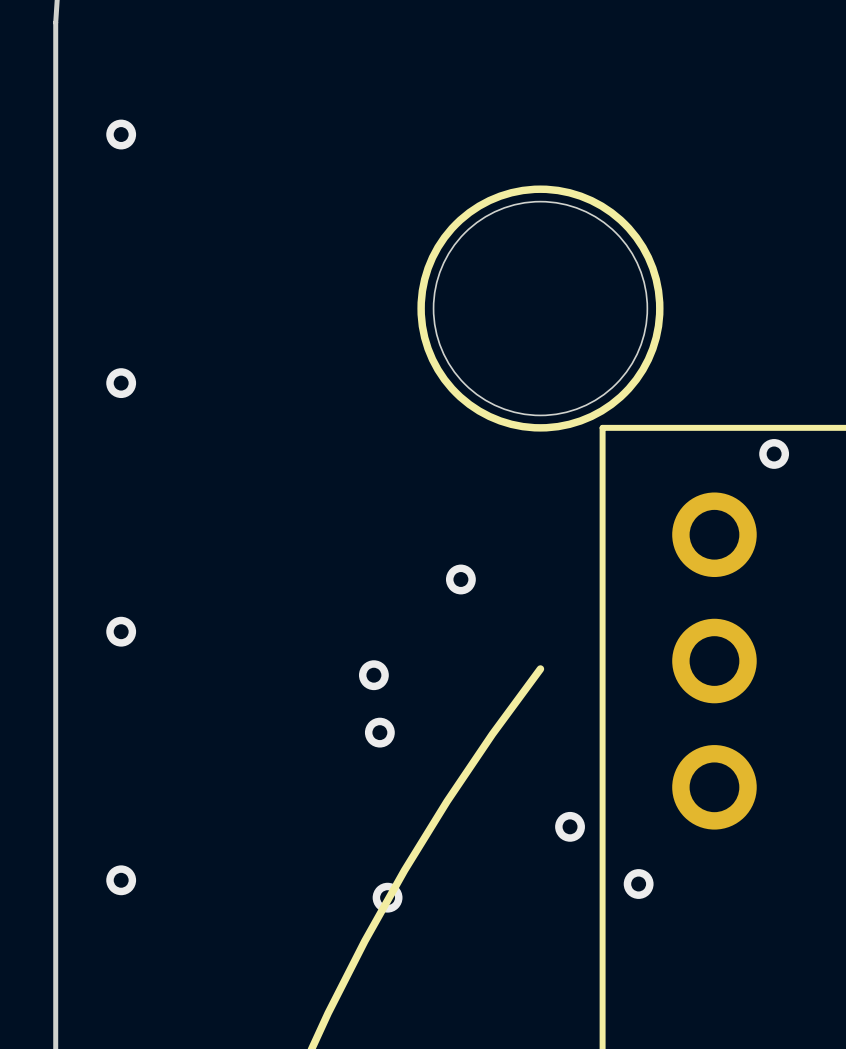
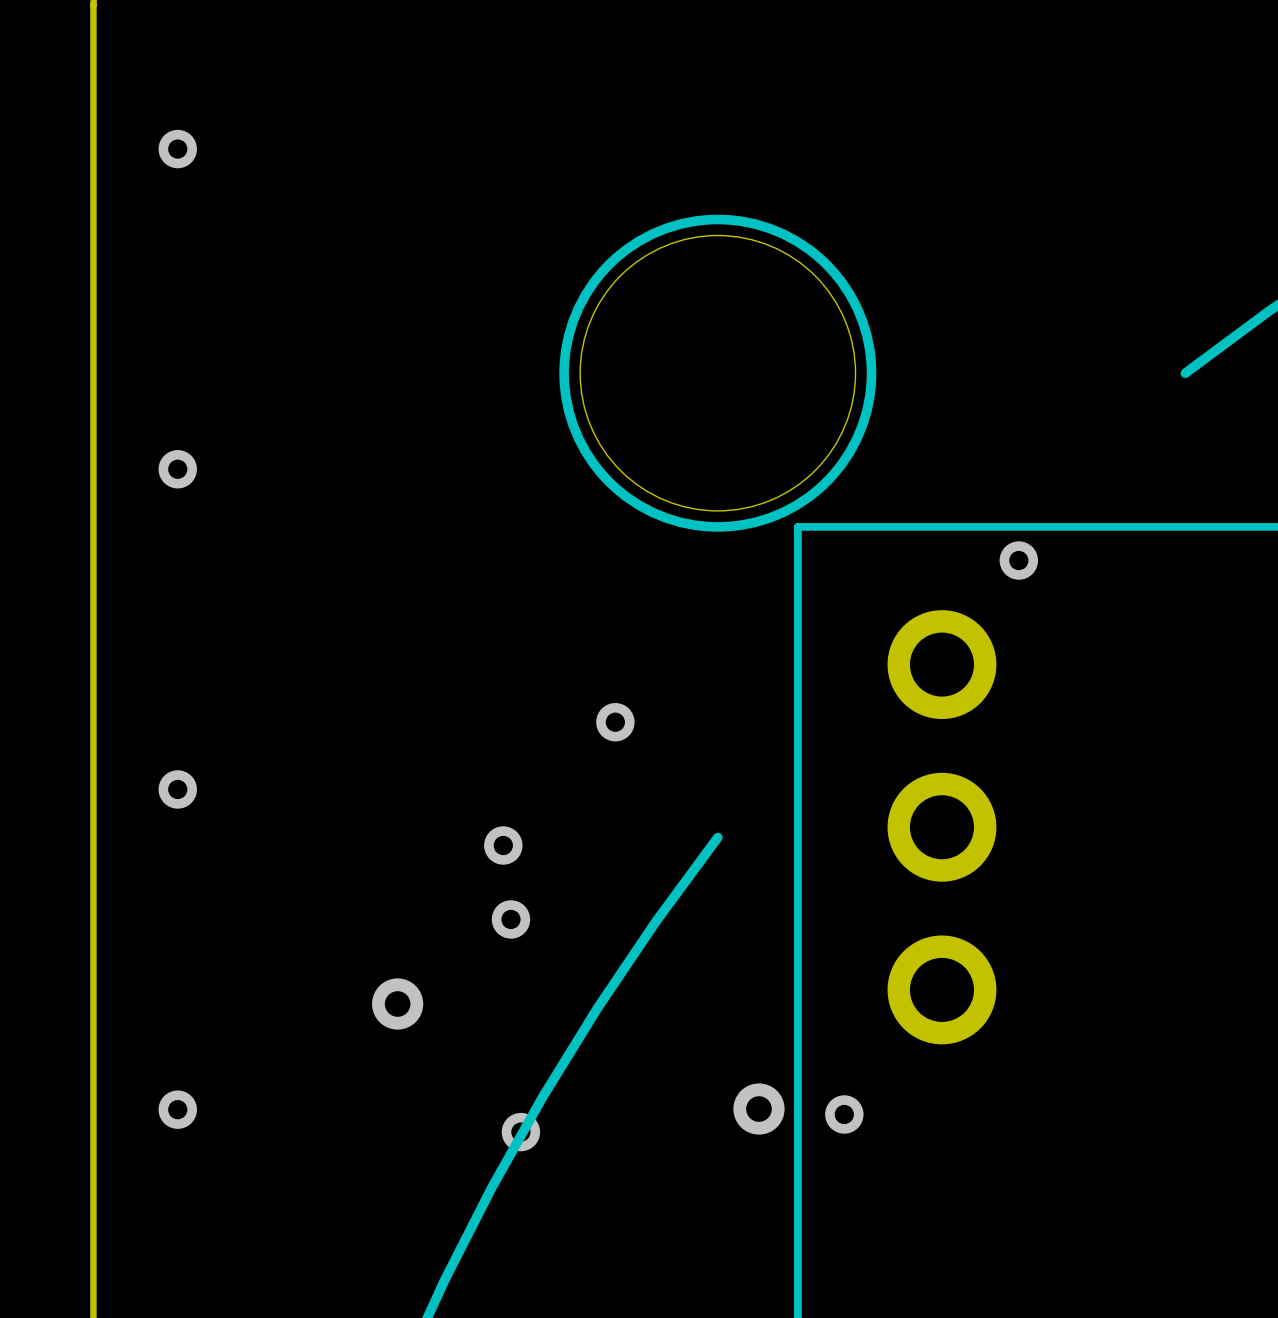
via: none -> (397, 1004)
via: (570, 826) -> none
via: none -> (758, 1109)

